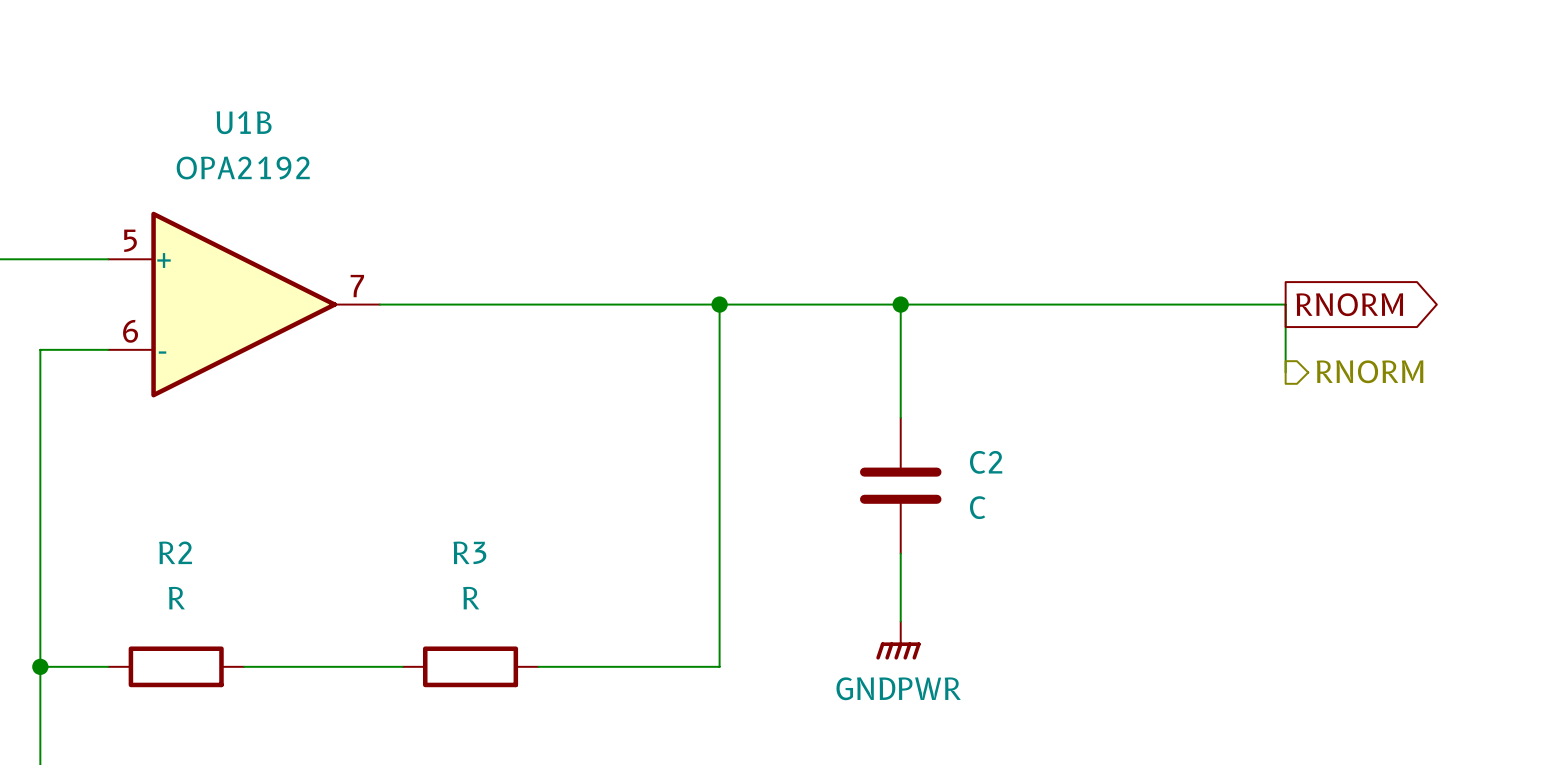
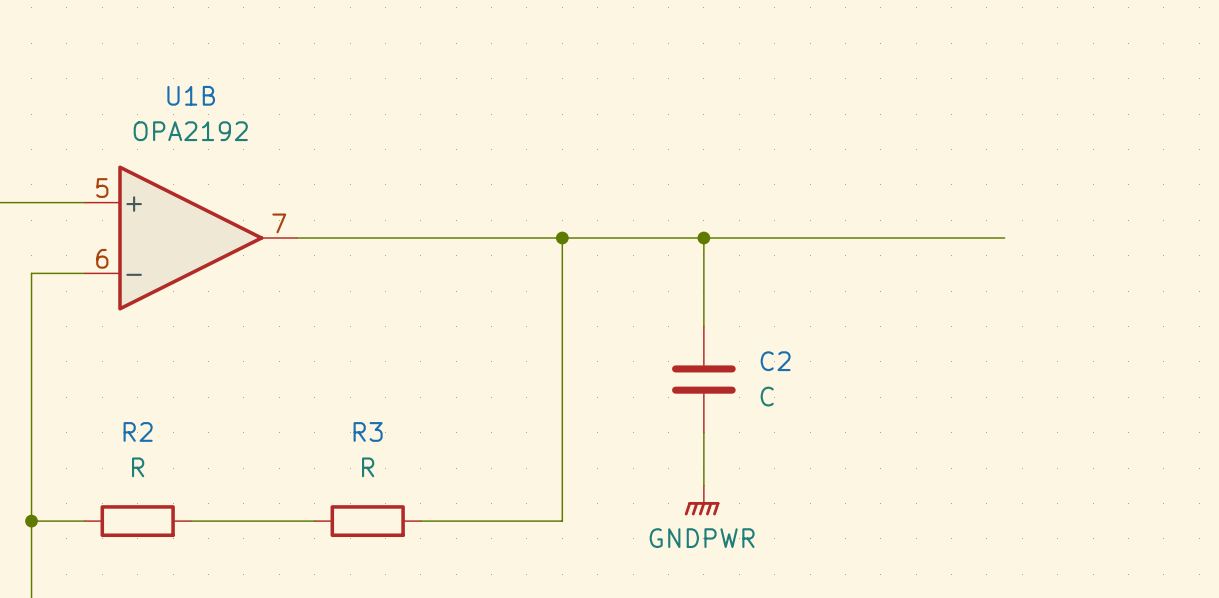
wire: (1285, 304) (1285, 372) -> none
global label: RNORM (1349, 304) -> none
hierarchical label: RNORM (1369, 371) -> none

